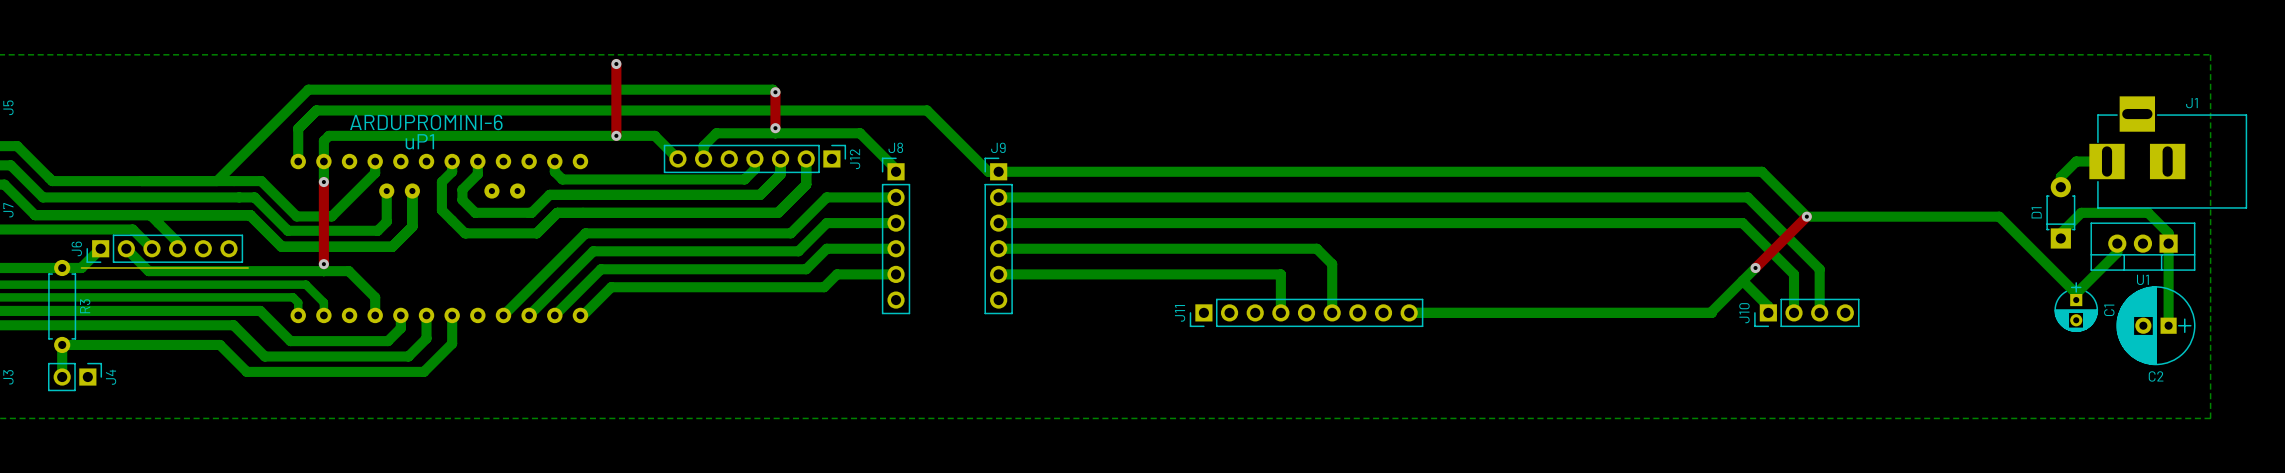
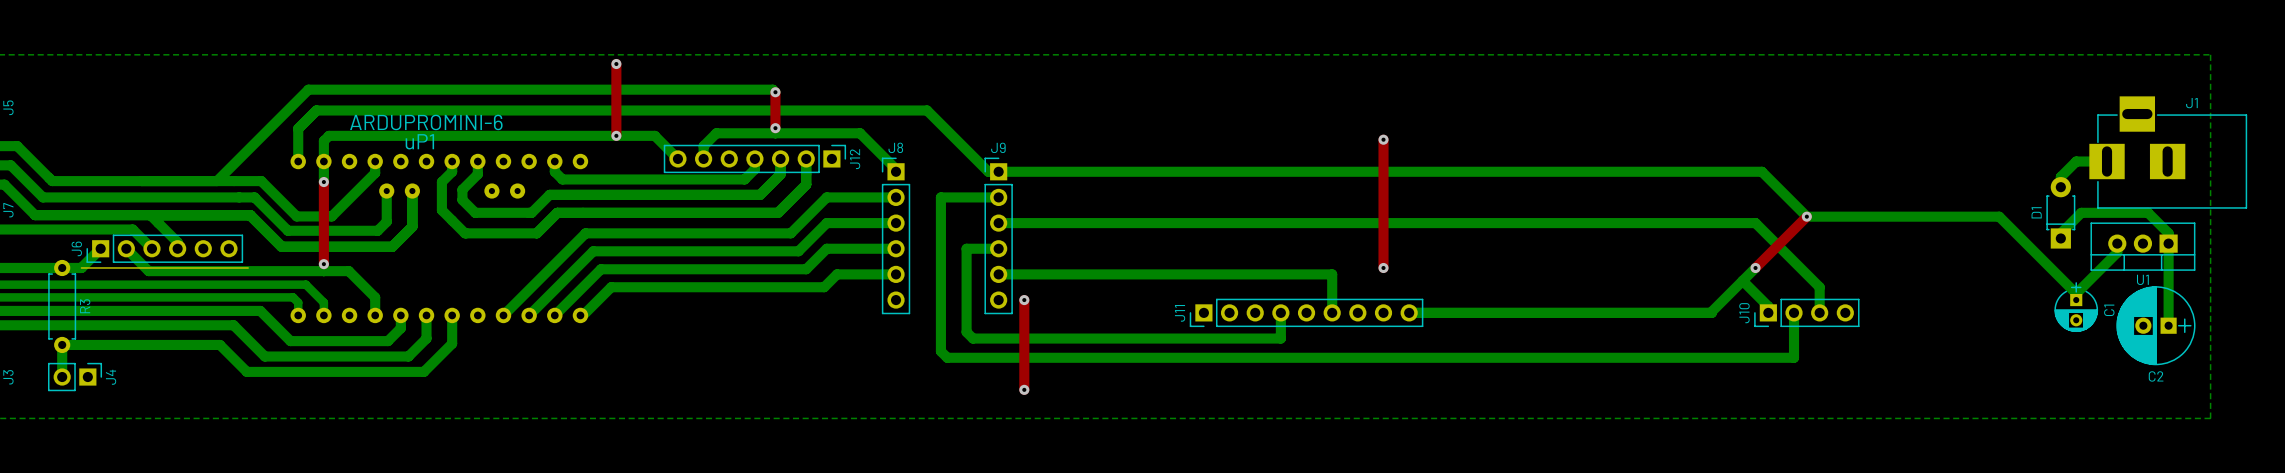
top track: none -> (1383, 139) (1383, 267)
via: none -> (1383, 139)
bottom track: (998, 197) (1747, 197) (1819, 269) (1819, 287) -> (998, 197) (940, 197) (940, 351) (947, 357) (1794, 357) (1794, 312)
bottom track: (1742, 223) (1794, 274) (1794, 312) -> (1742, 223) (1755, 223) (1819, 287)
bottom track: (998, 248) (1316, 248) (1332, 264) (1332, 274) -> (998, 248) (966, 248) (966, 332) (973, 338) (1280, 338) (1280, 312)
via: none -> (1383, 267)
bottom track: (1280, 274) (1280, 312) -> (1280, 274) (1332, 274)
top track: none -> (1024, 300) (1024, 389)
via: none -> (1024, 300)
via: none -> (1024, 389)

